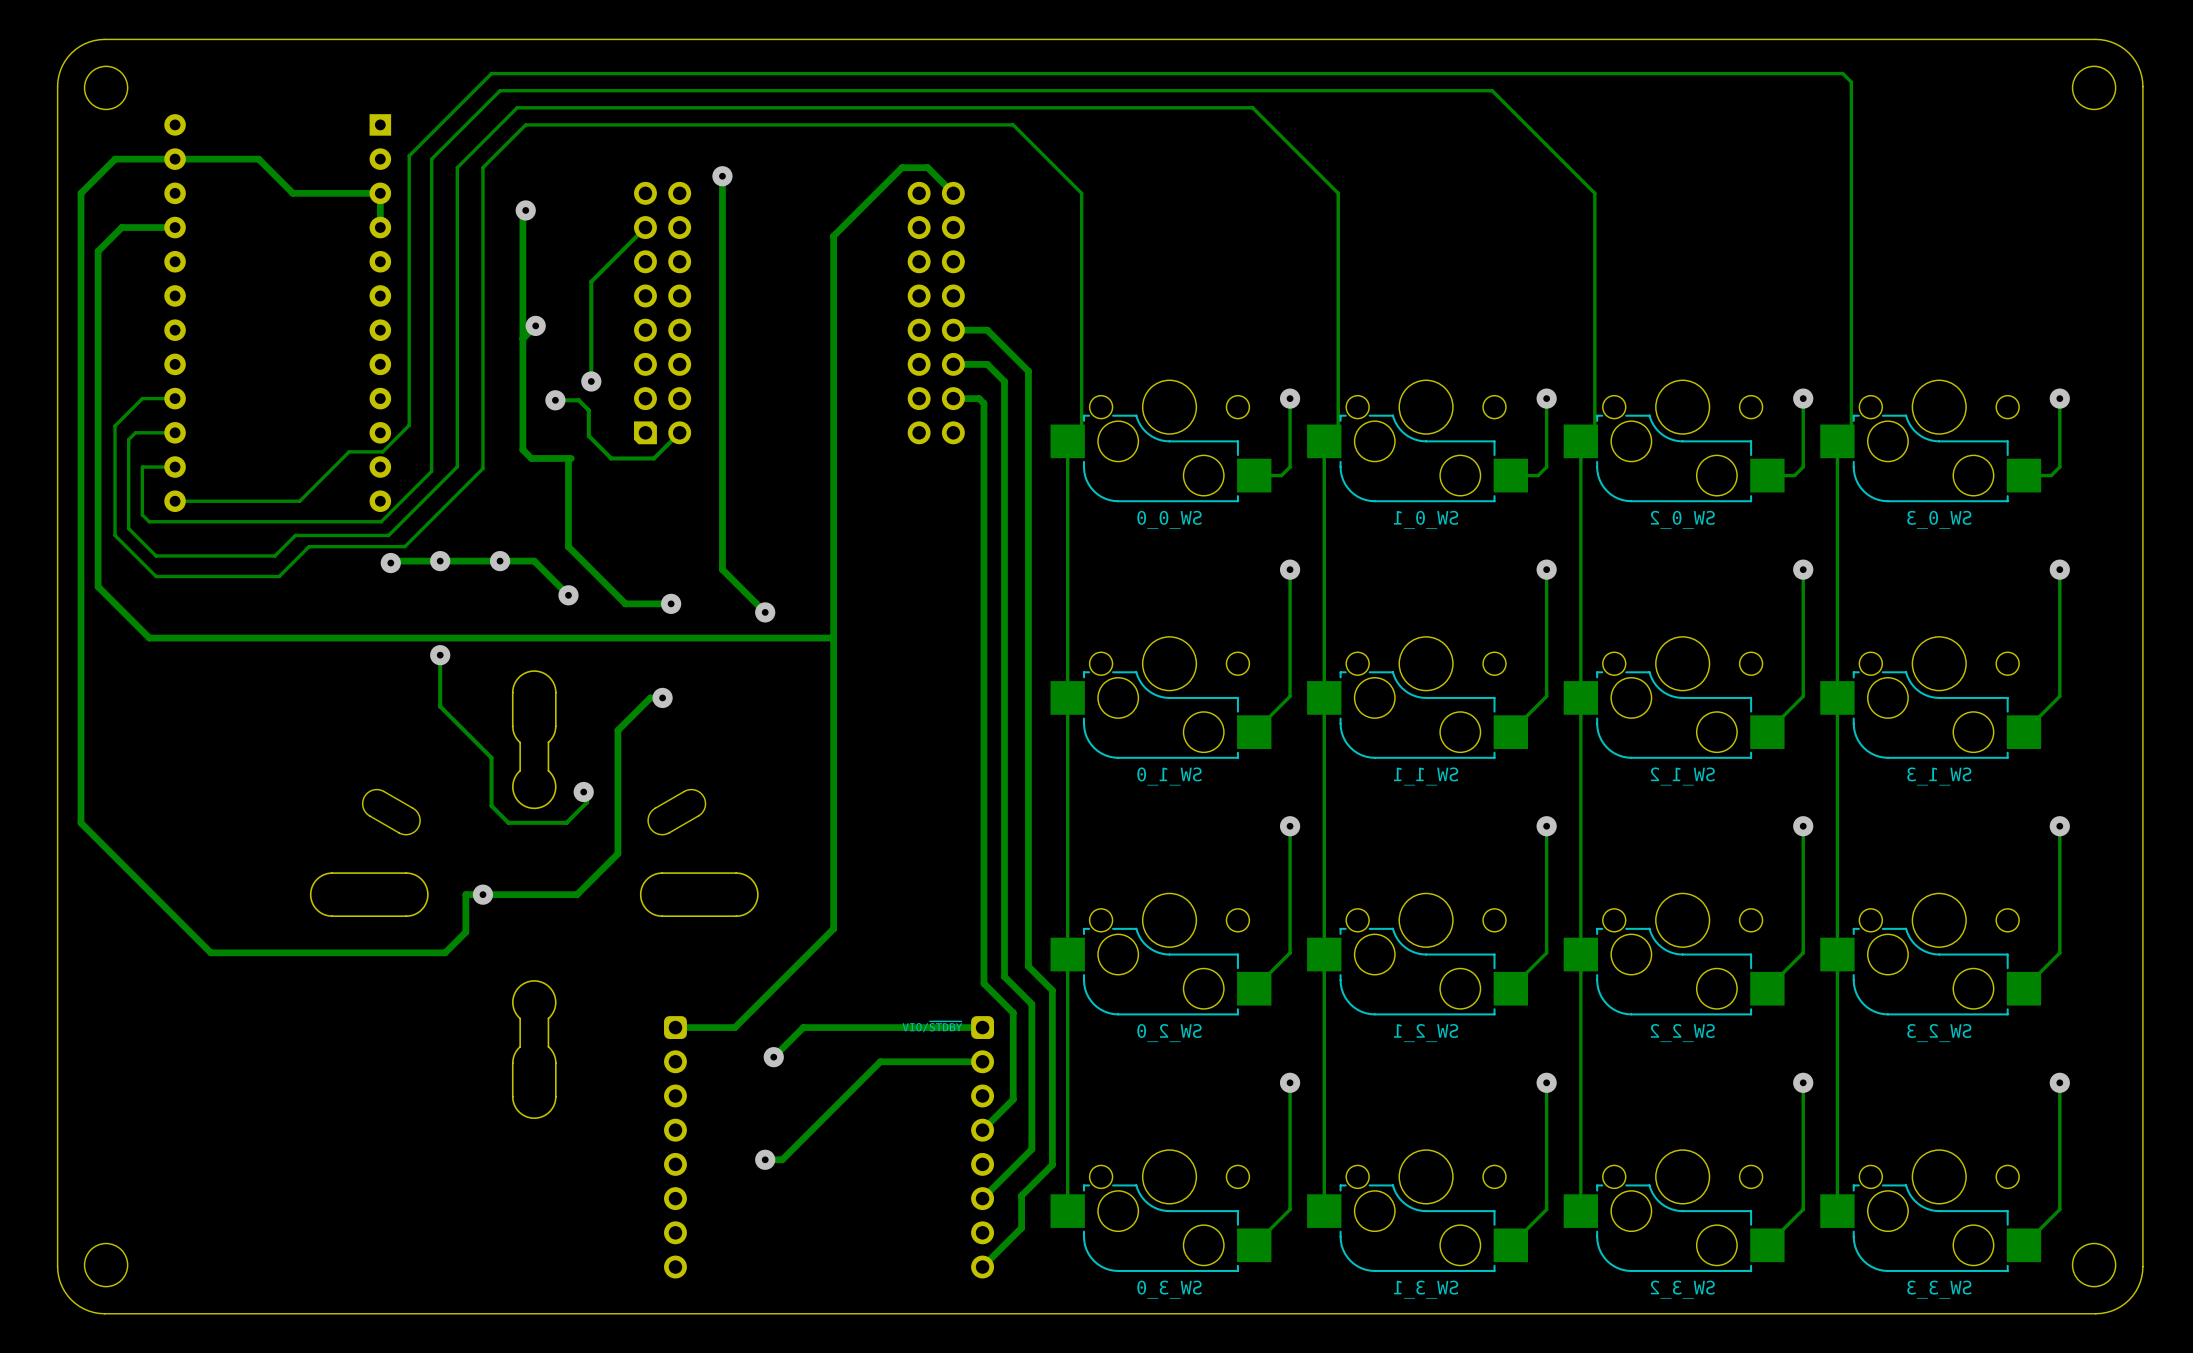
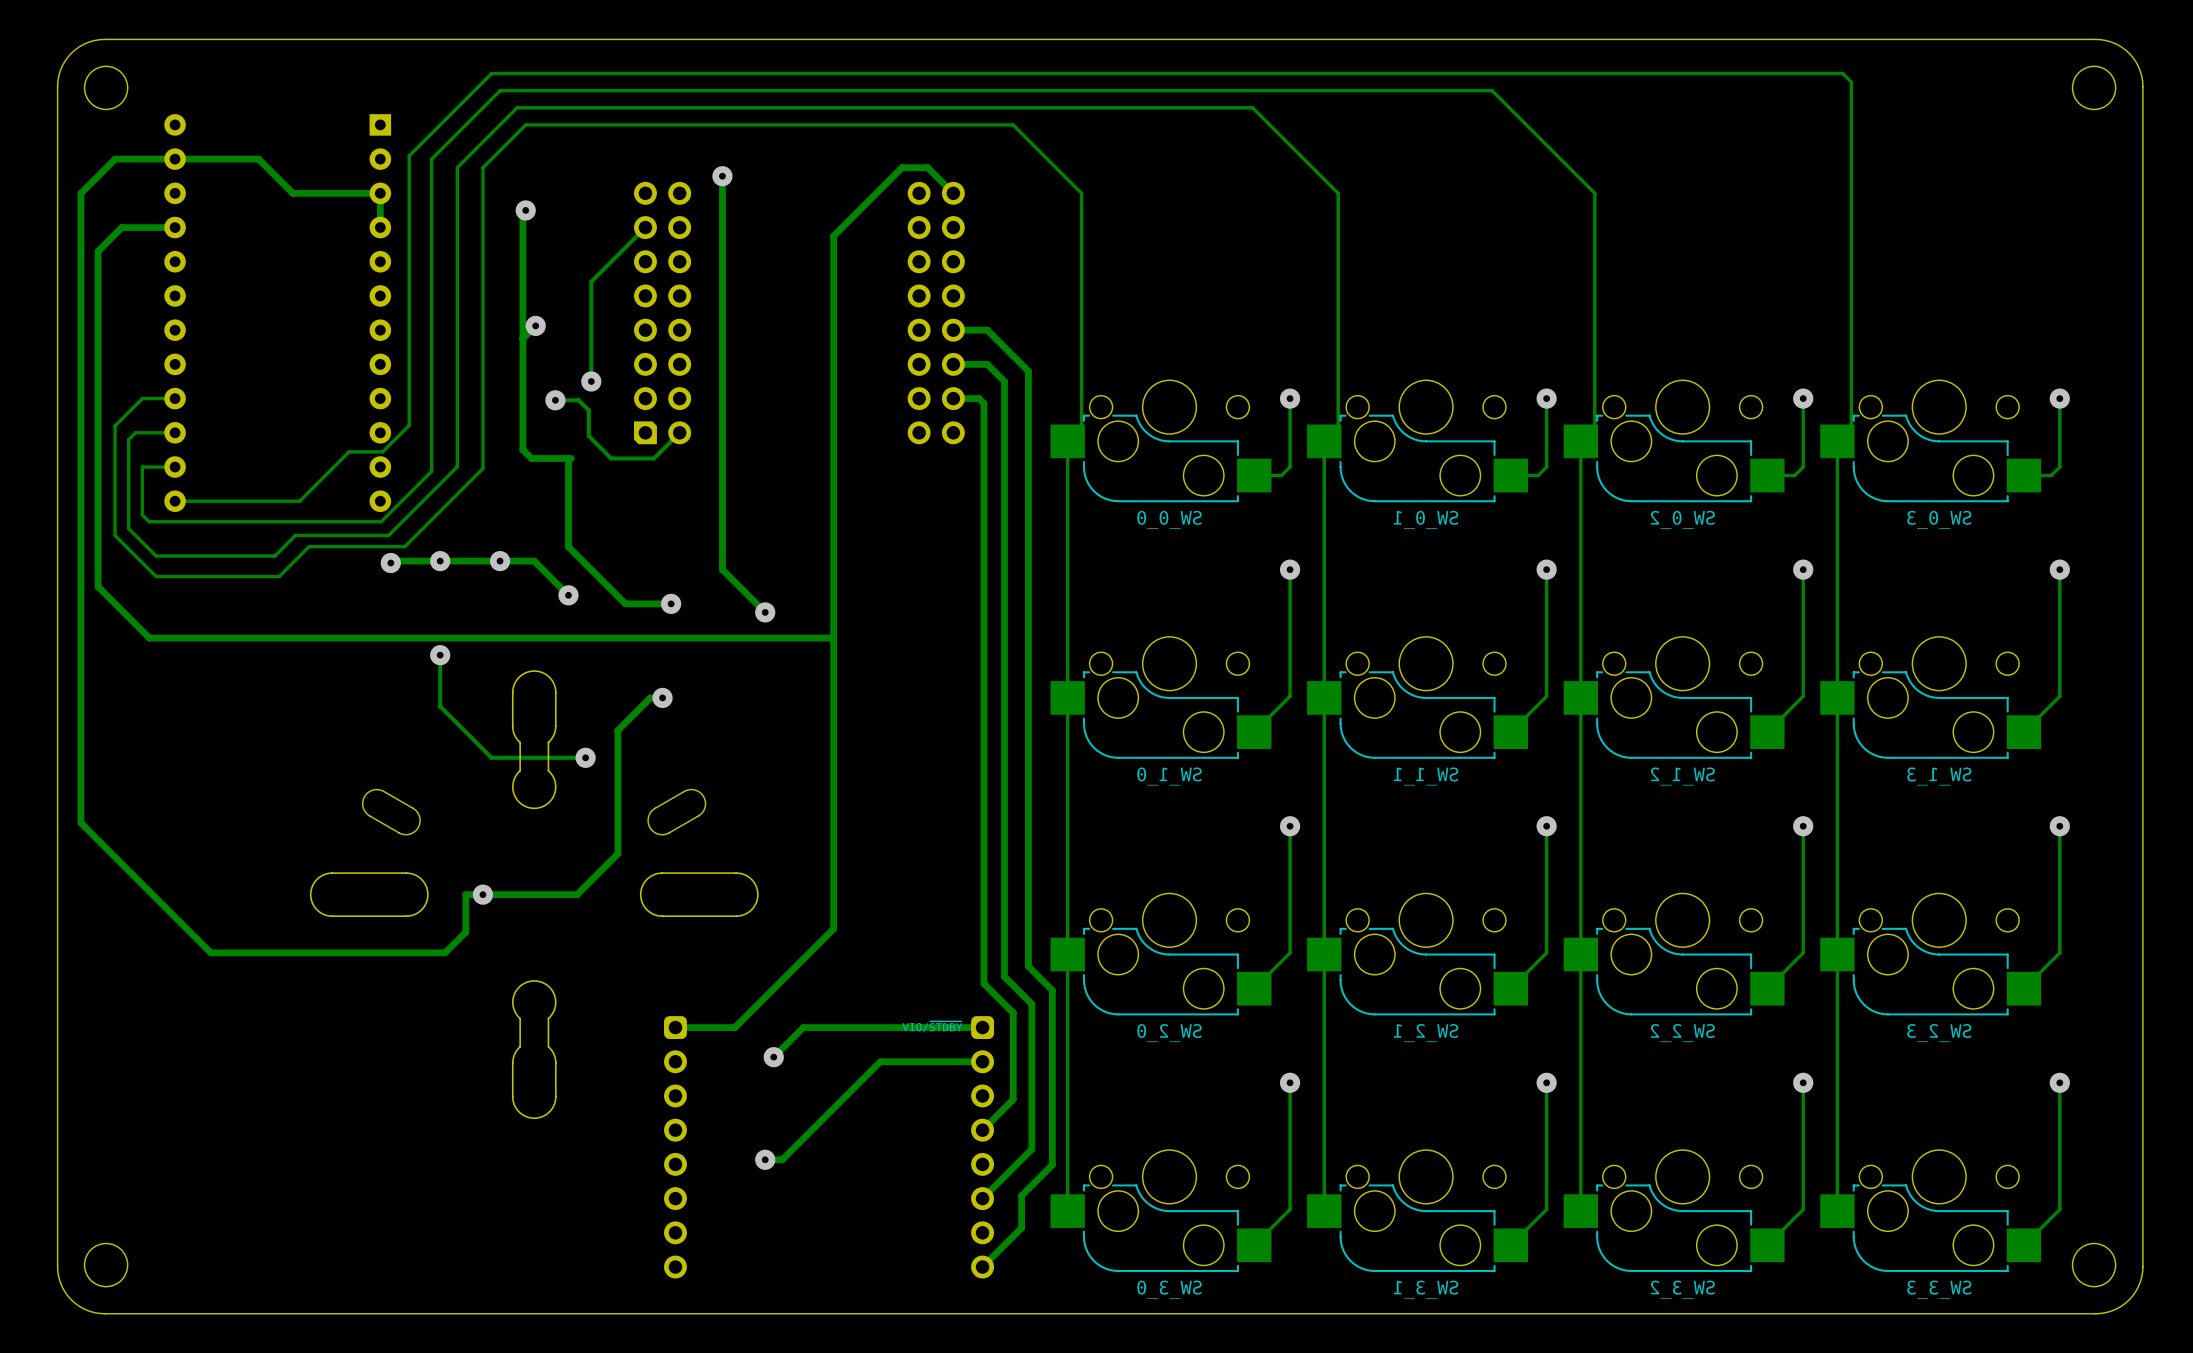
track: (491, 757) (491, 805) (508, 822) (566, 822) (587, 802) (587, 795) (583, 792) -> (491, 757) (585, 757)
via position: (583, 792) -> (585, 757)

